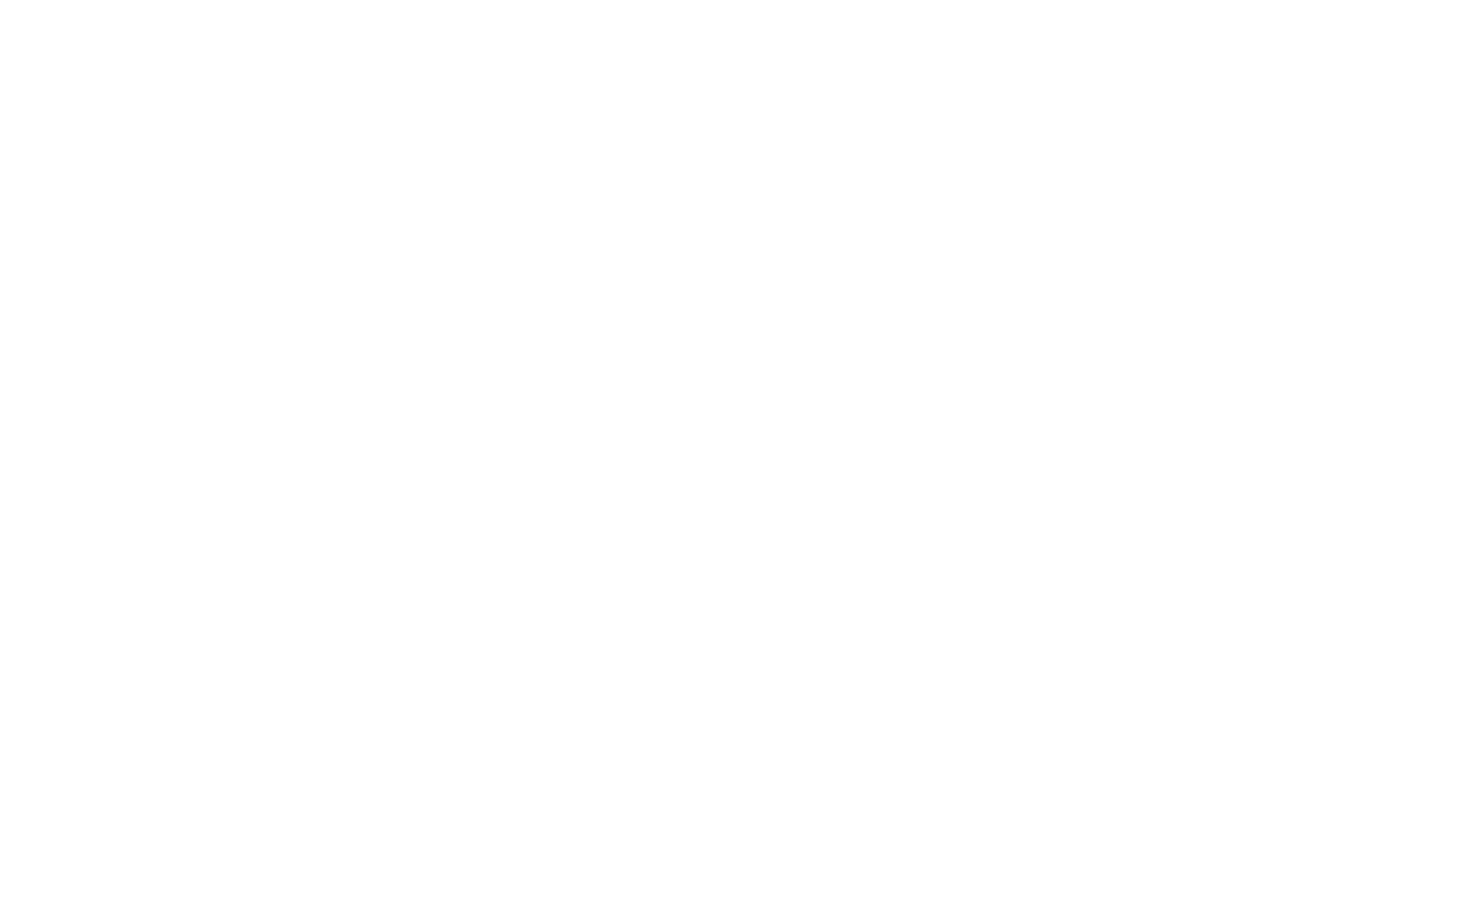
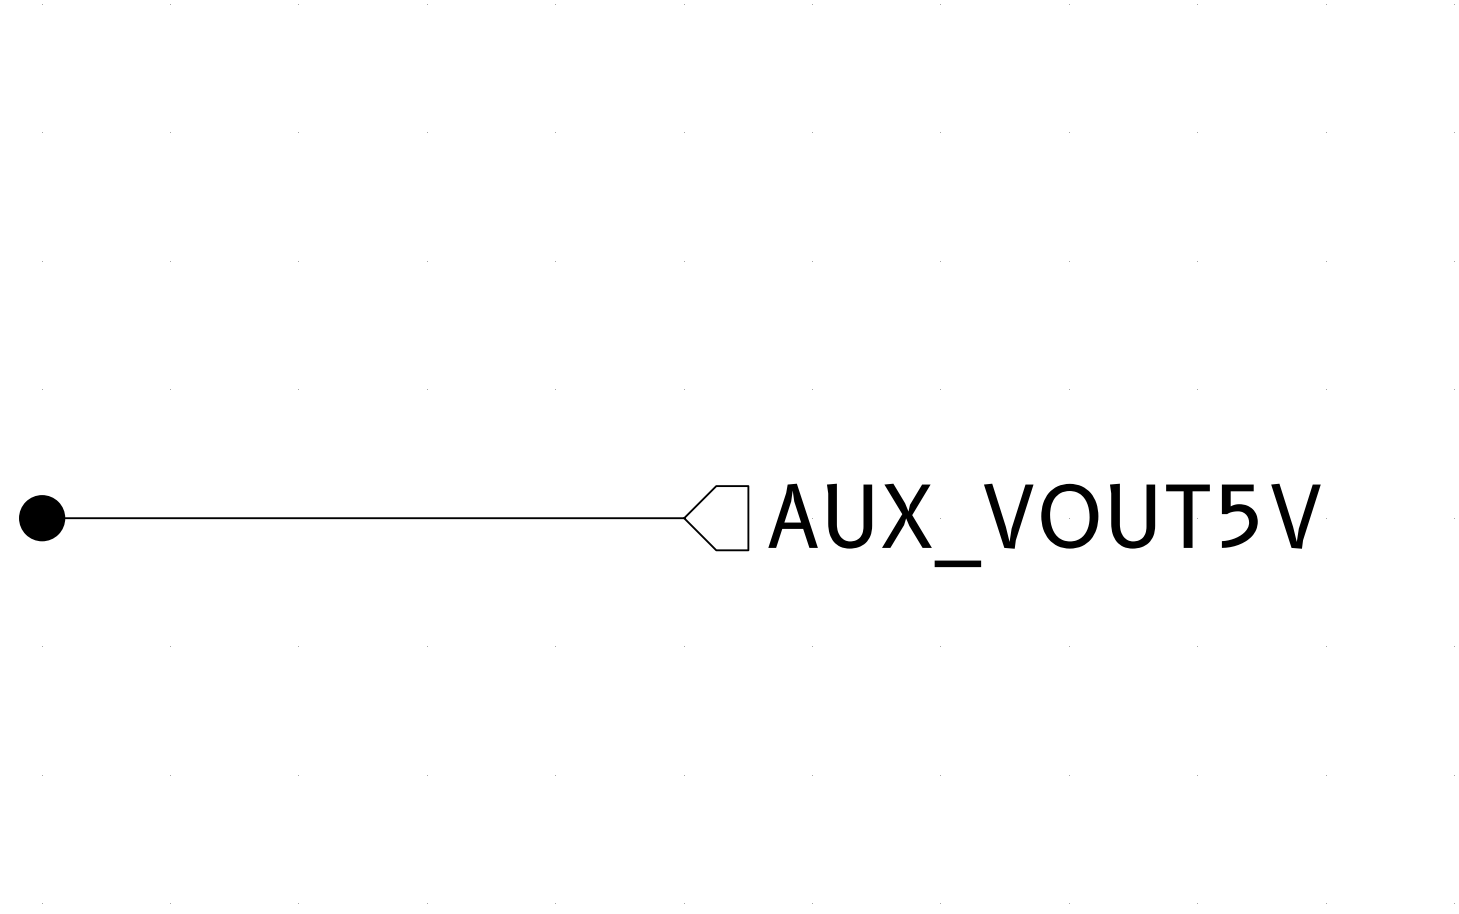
wire: none -> (42, 518) (684, 518)
junction: none -> (42, 518)
hierarchical label: none -> AUX_VOUT5V (1044, 525)

